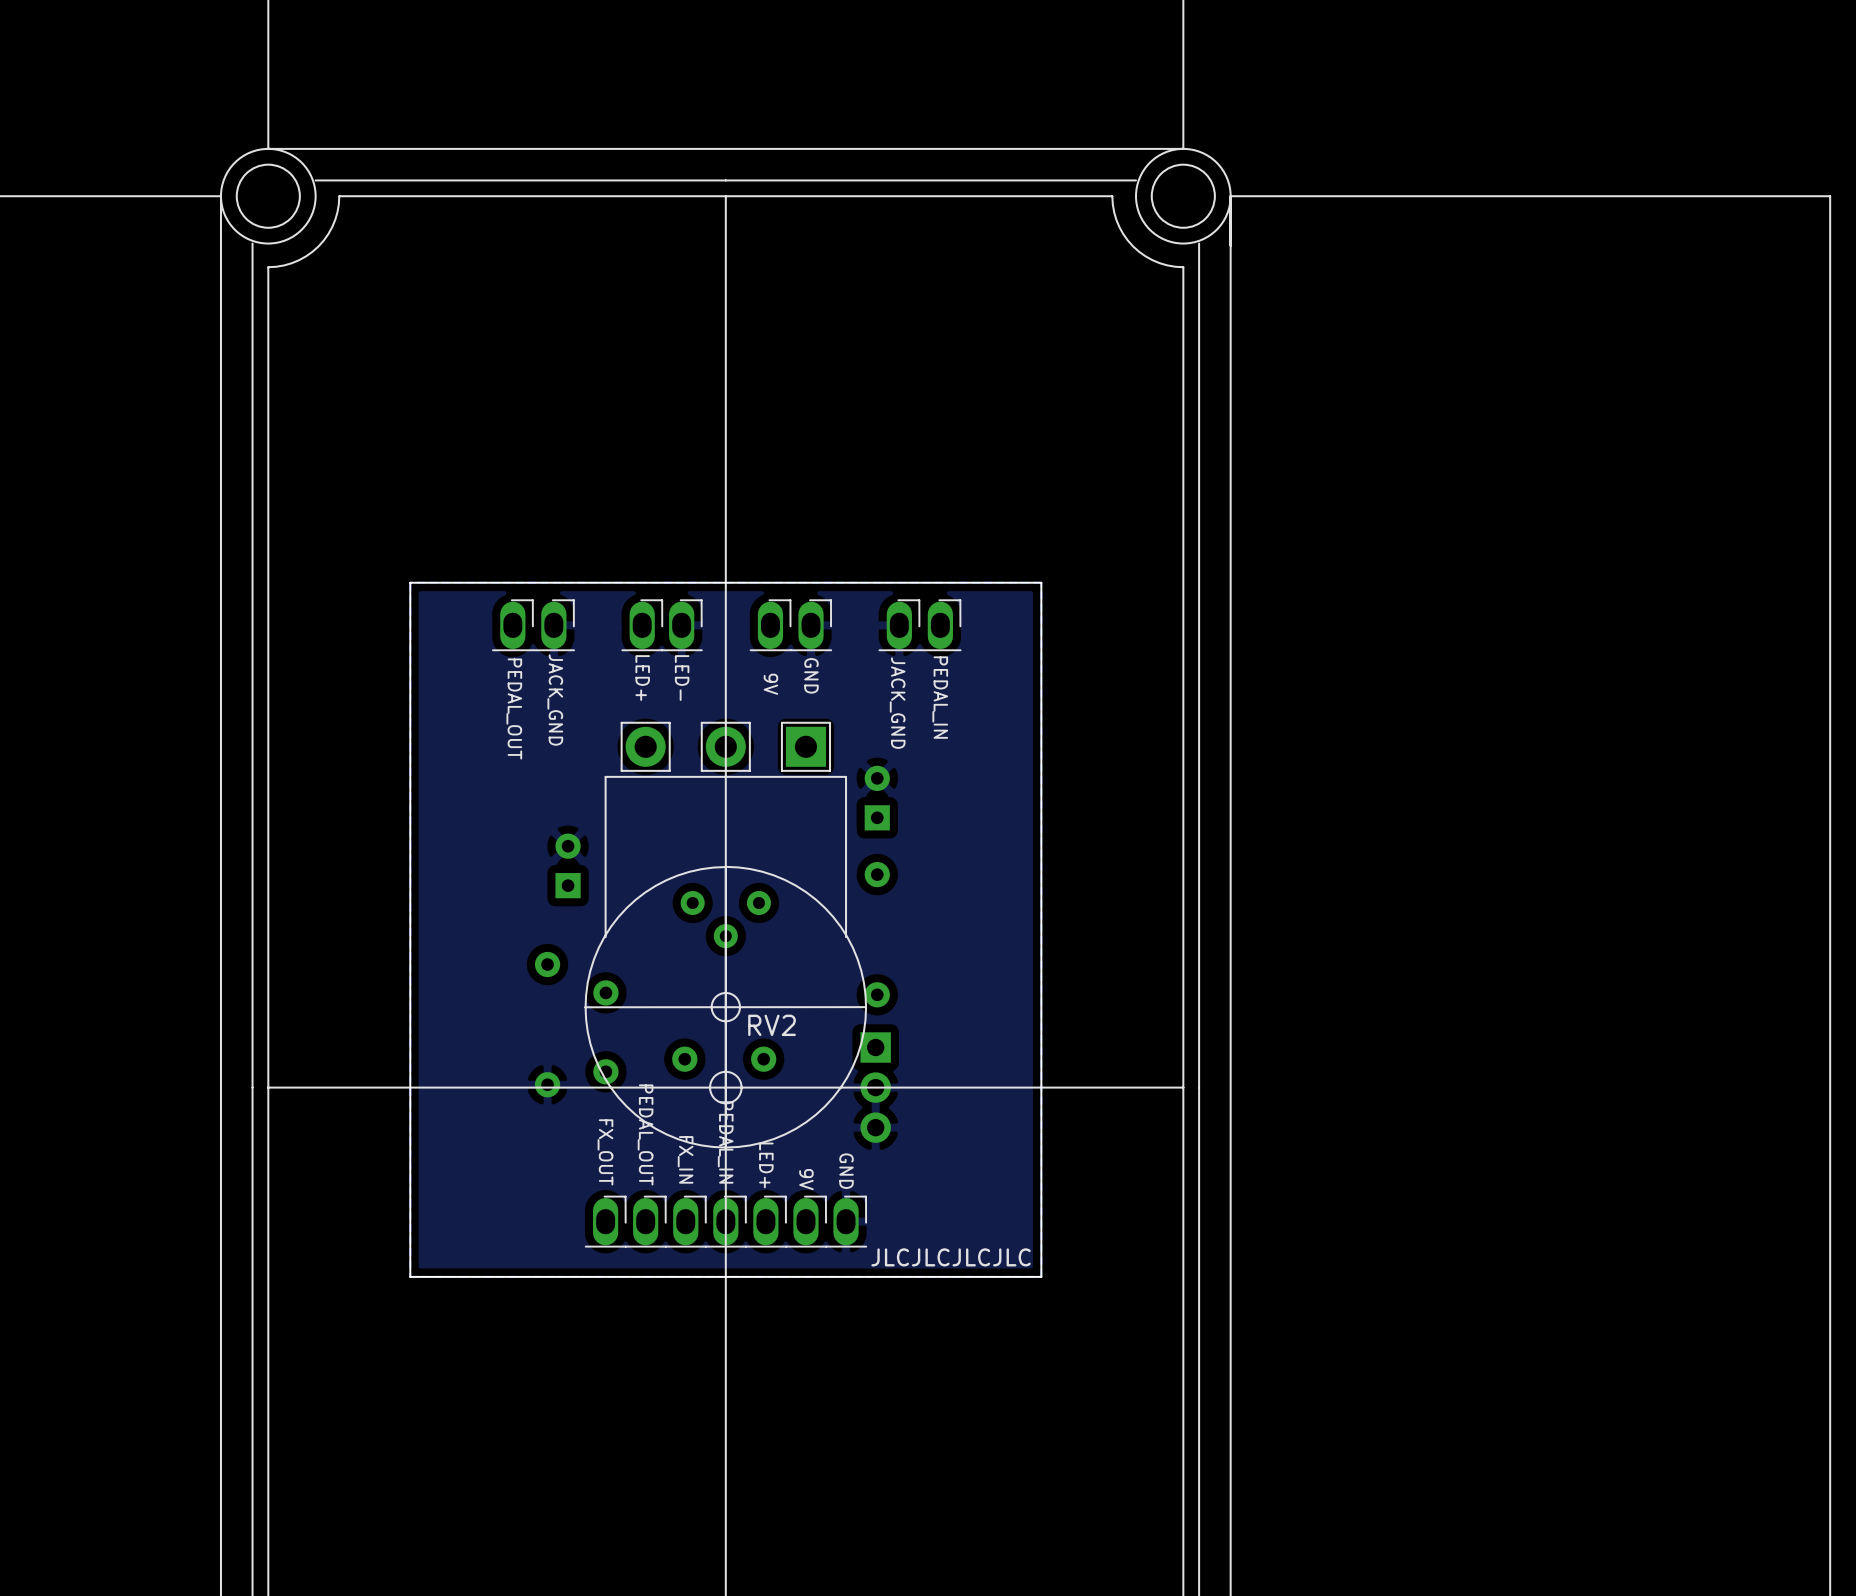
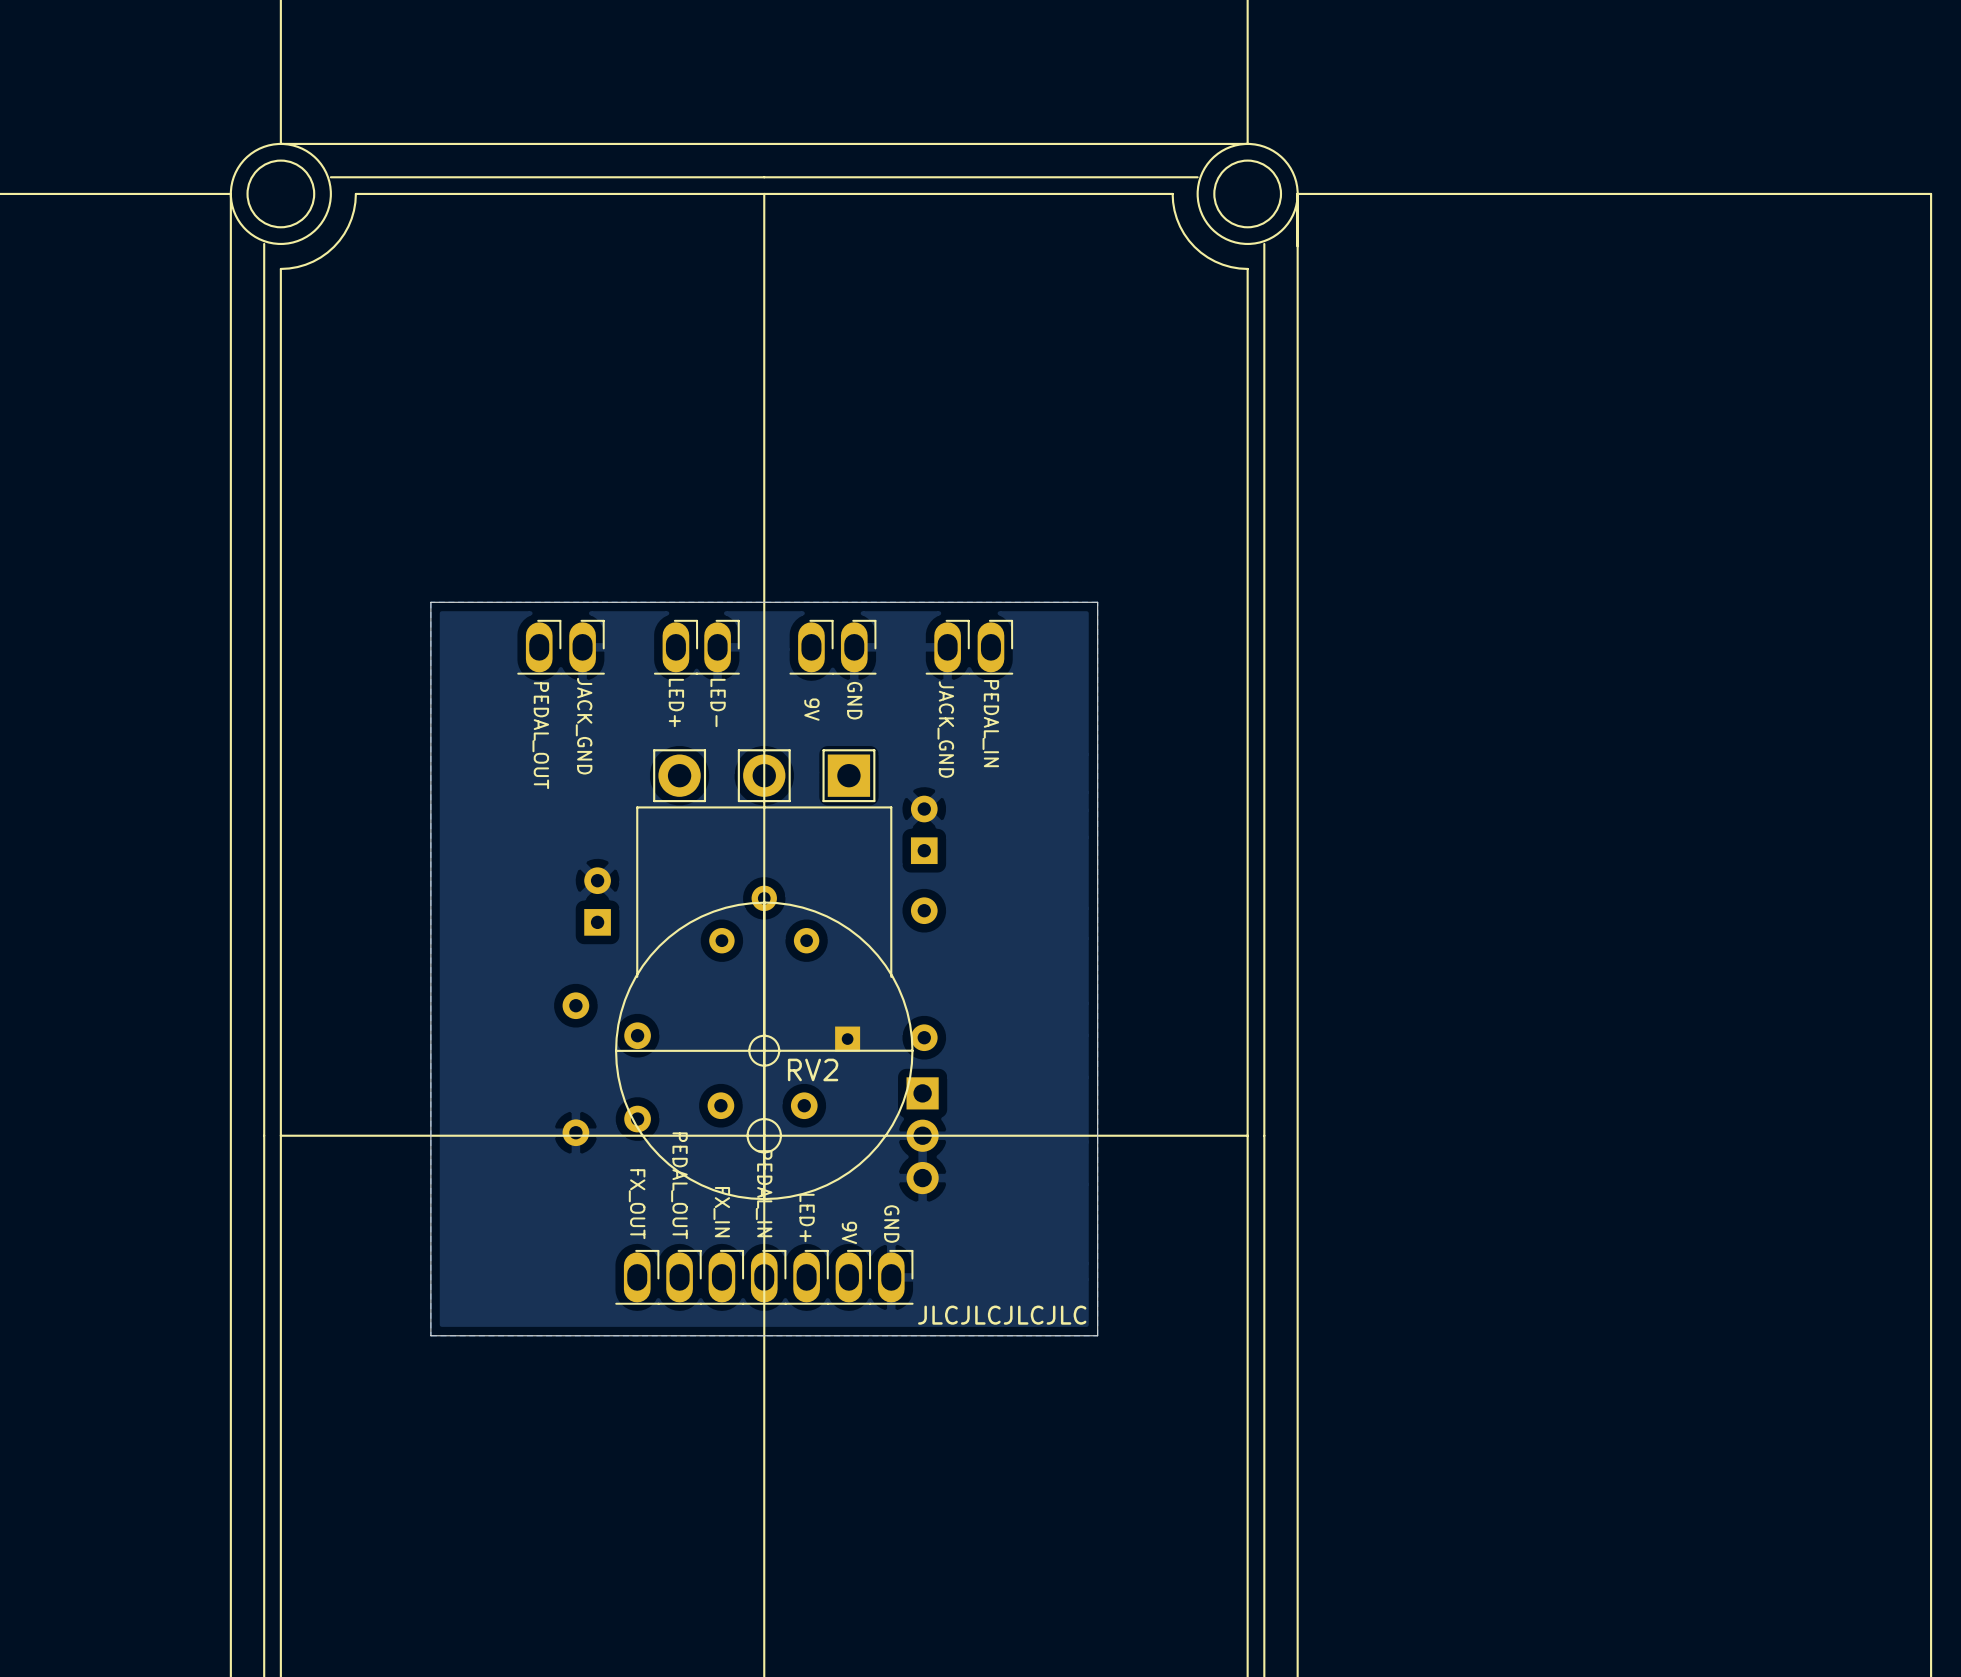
part: none -> (764, 919)
part: (725, 919) -> none
part: none -> (847, 1039)

